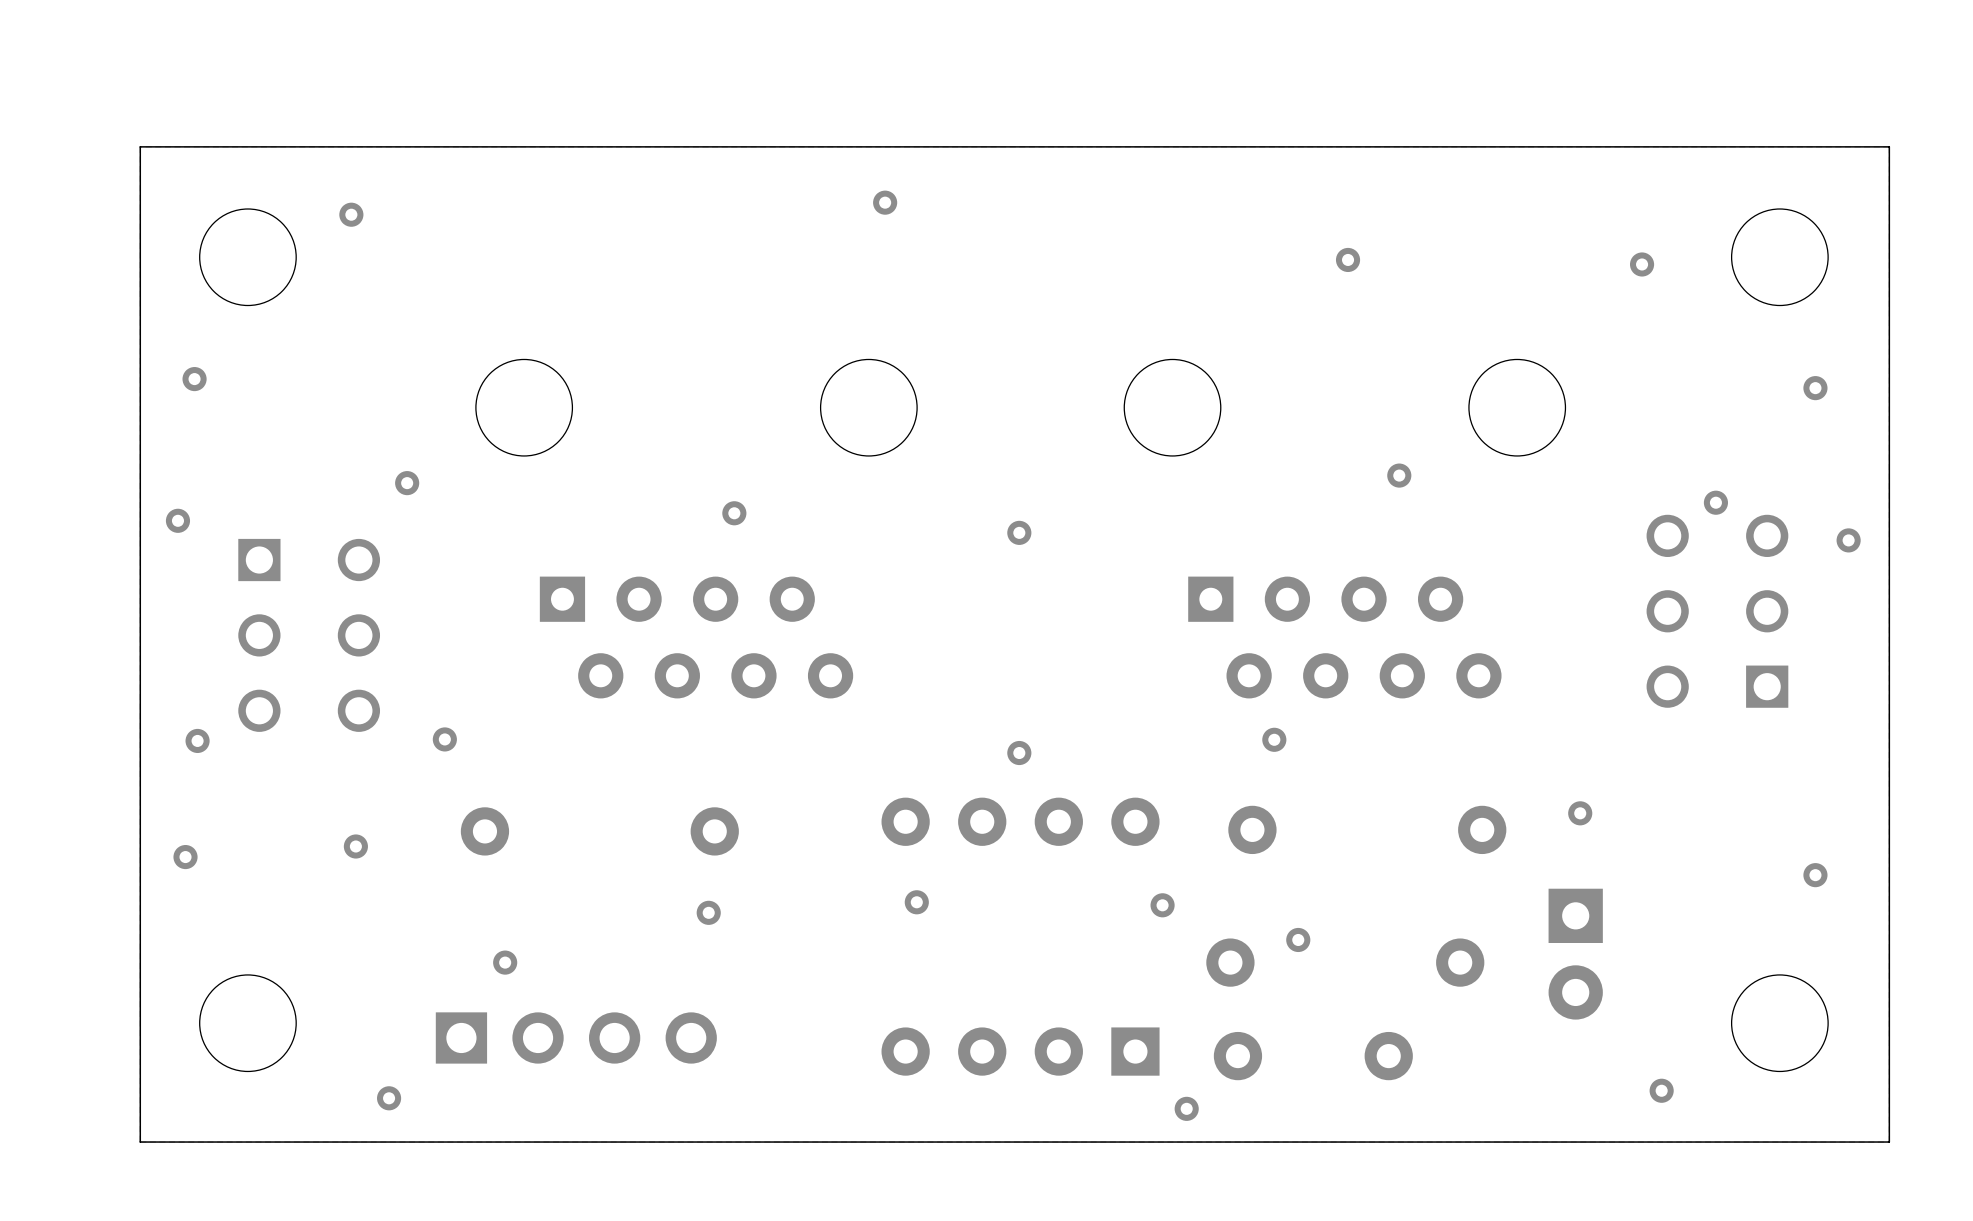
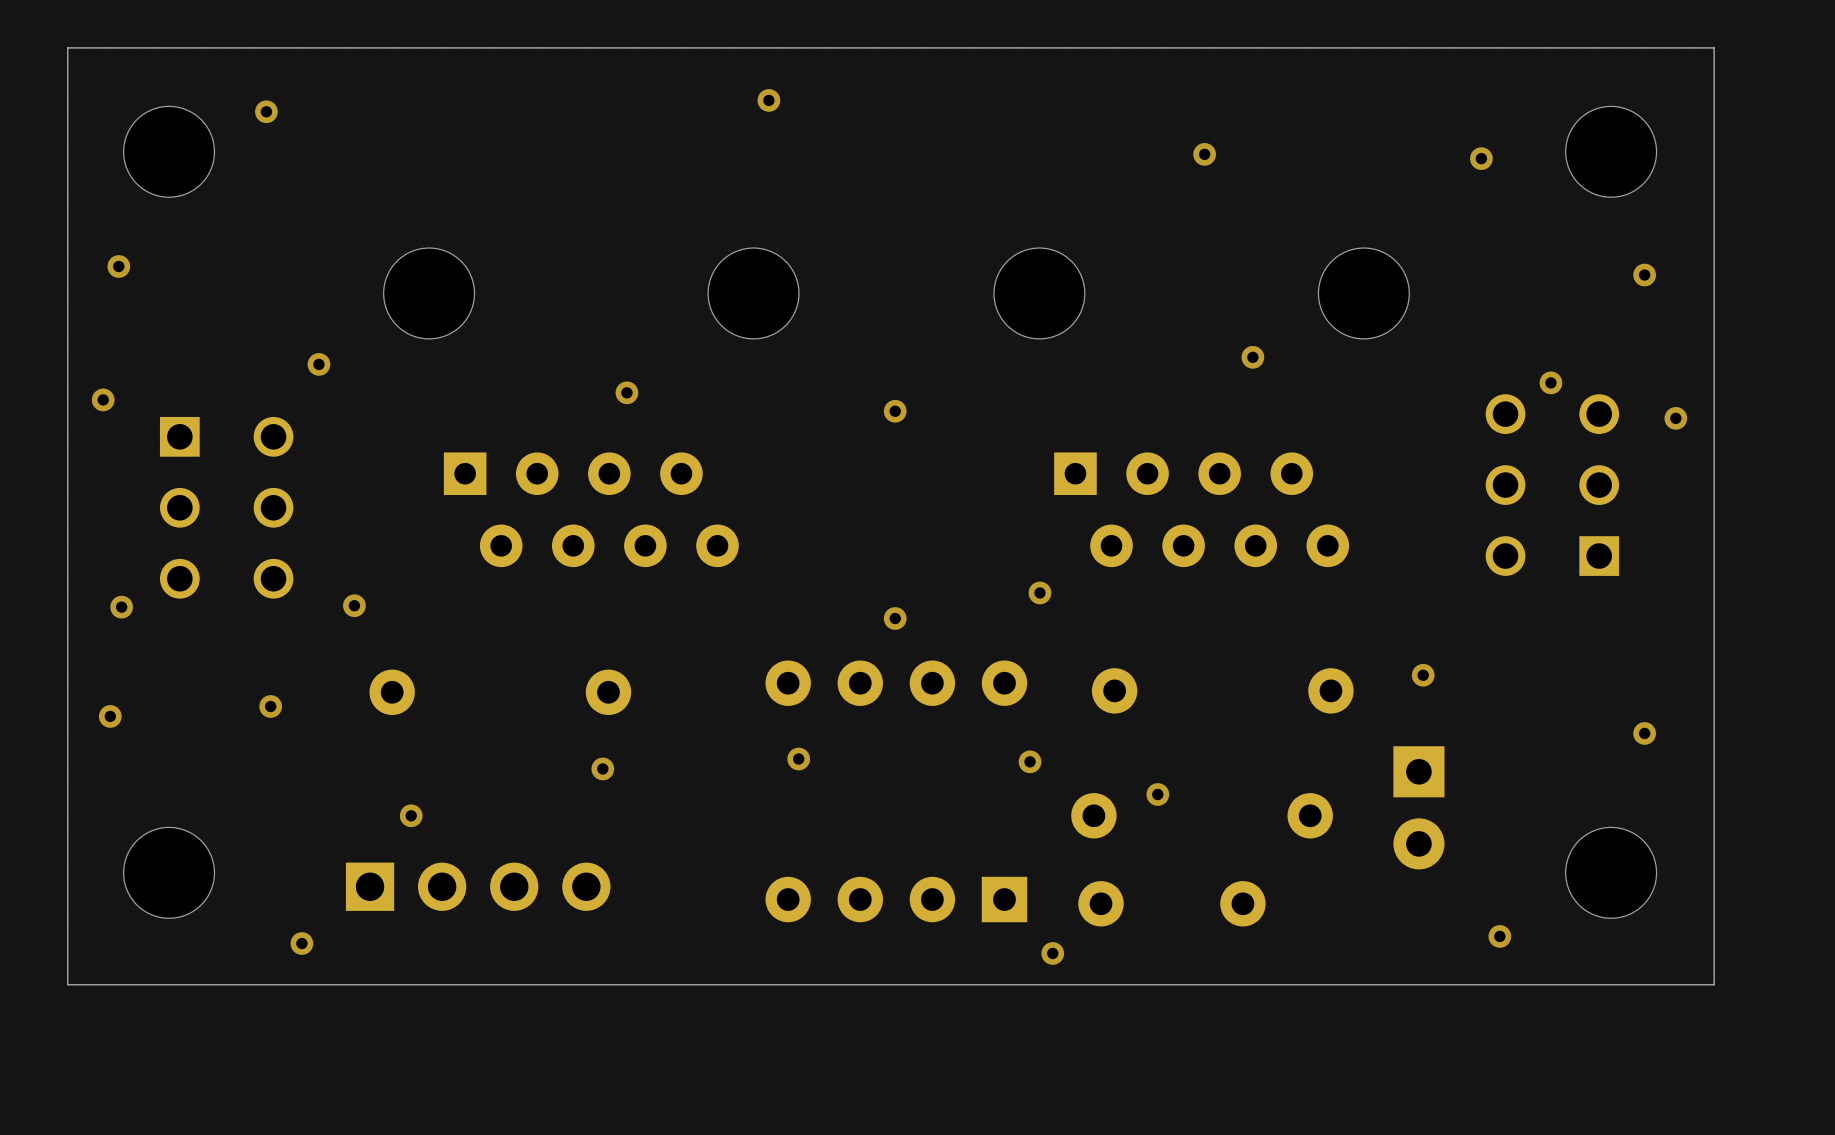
via position: (1274, 739) -> (1039, 592)

